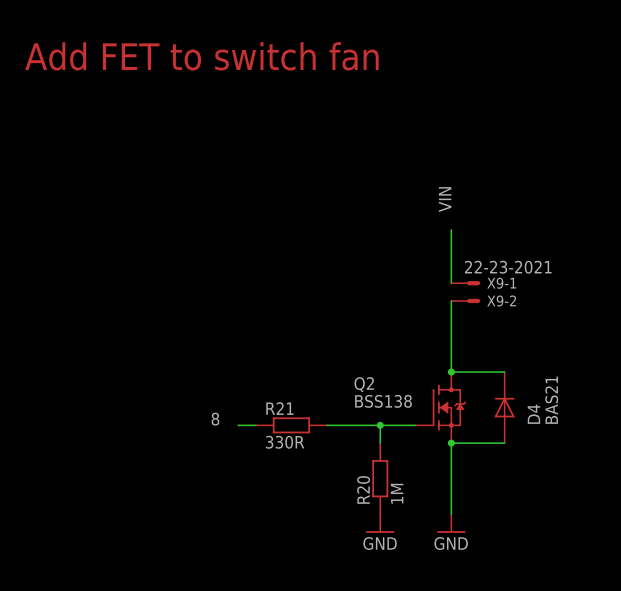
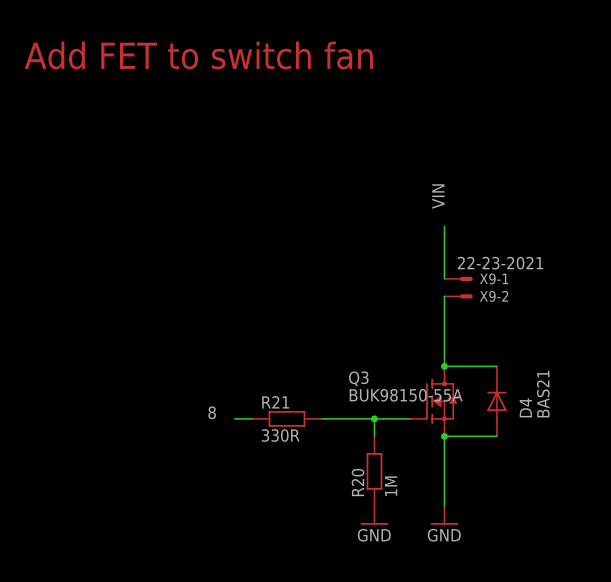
Q2 name: Q2 (364, 384) -> Q3 (358, 378)
Q2 value: BSS138 (383, 401) -> BUK98150-55A (406, 395)

